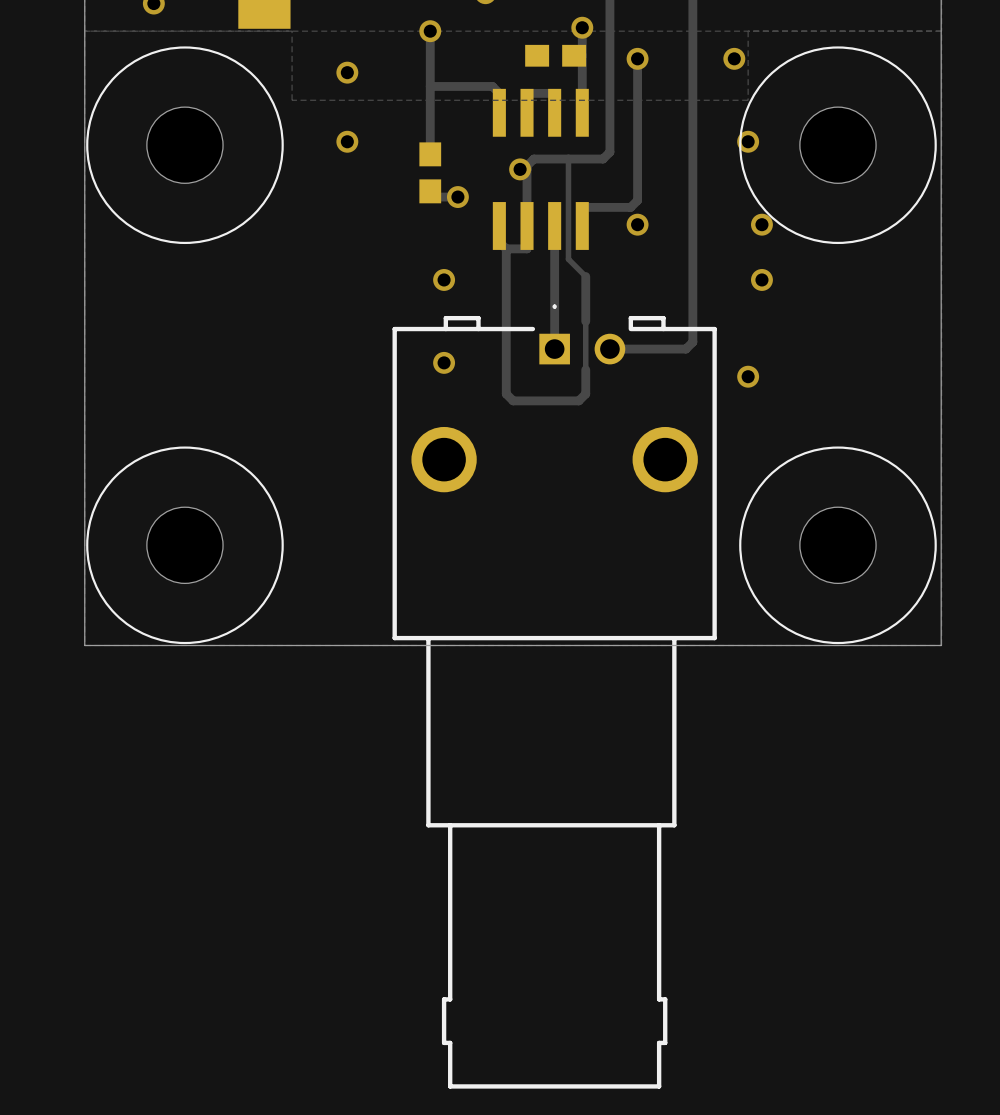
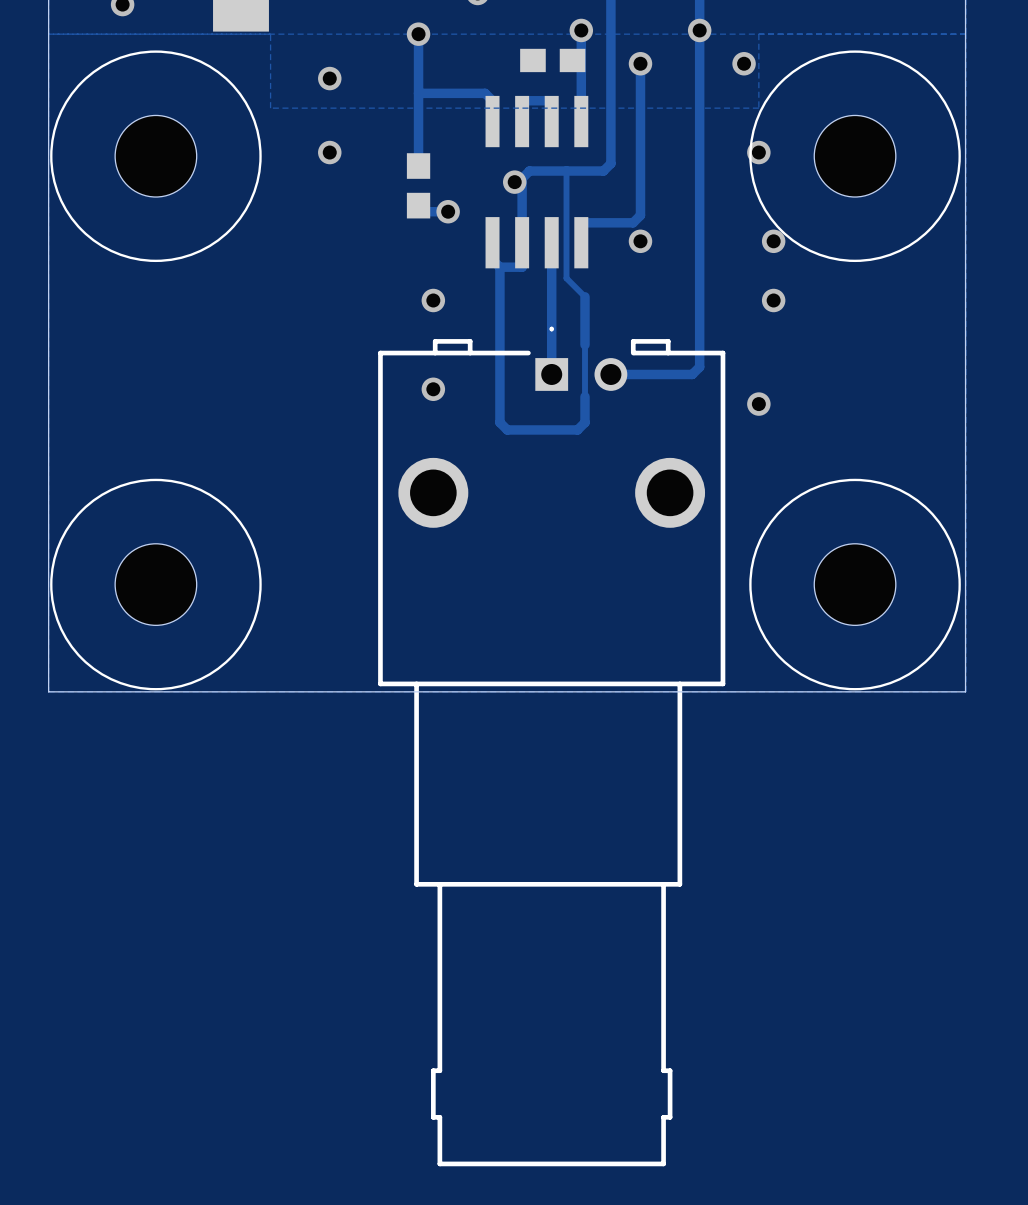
via: none -> (699, 30)

